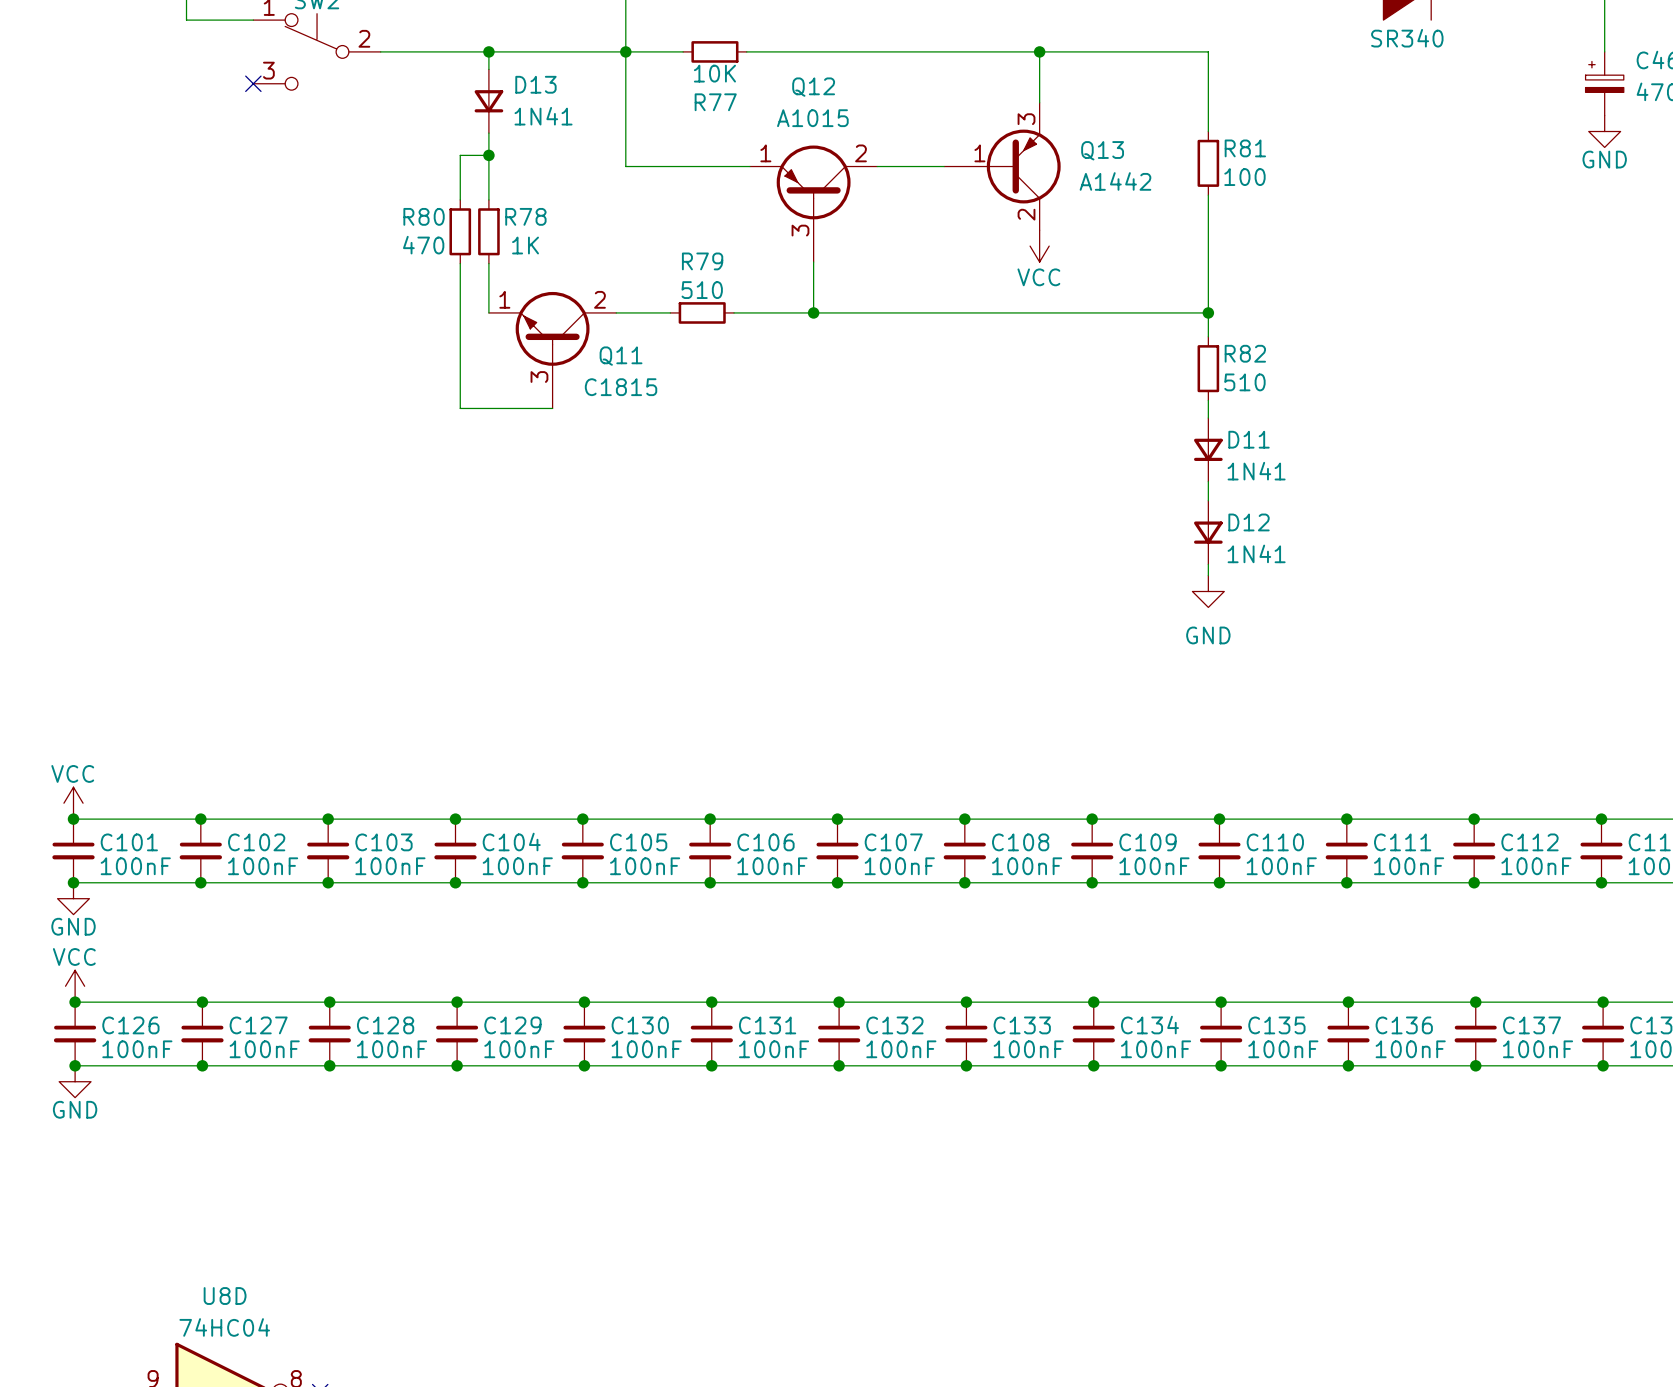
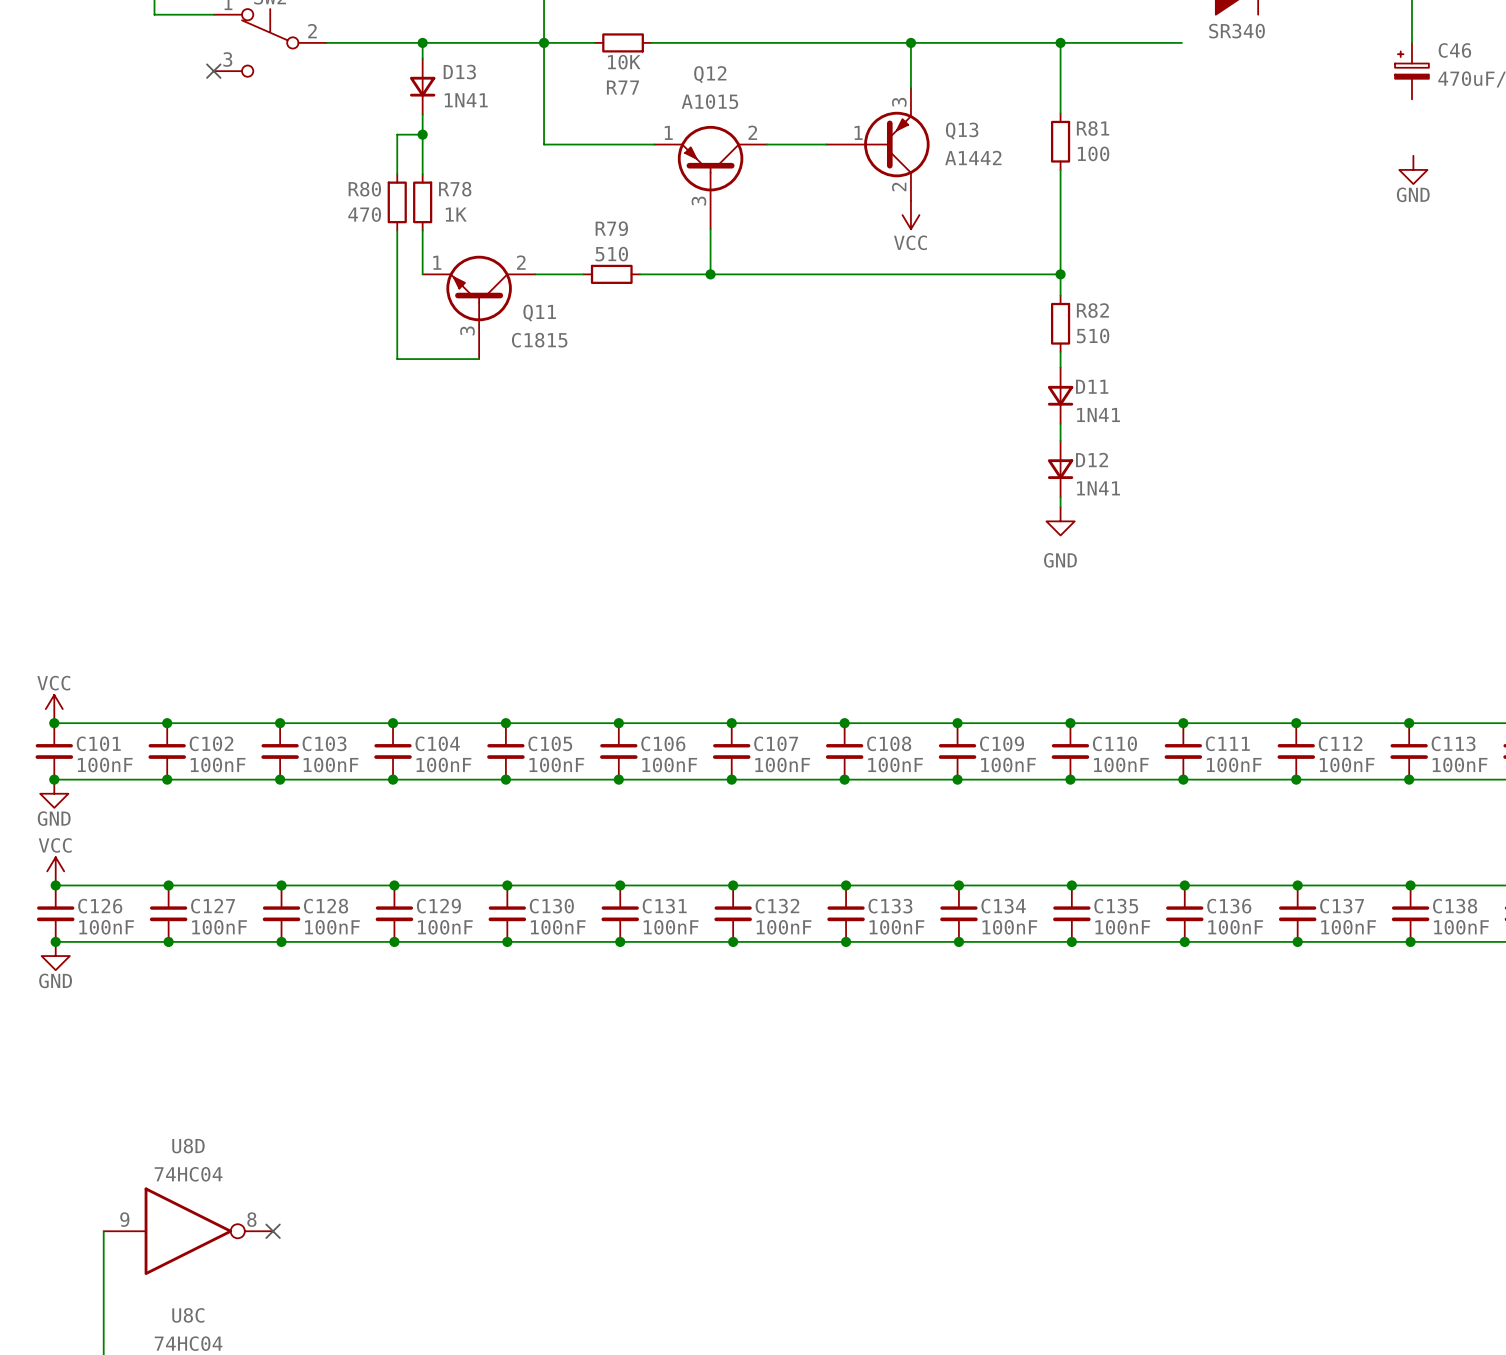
wire: none -> (1060, 42) (1181, 42)
junction: none -> (1060, 42)
power symbol position: GND (1604, 131) -> GND (1413, 169)

